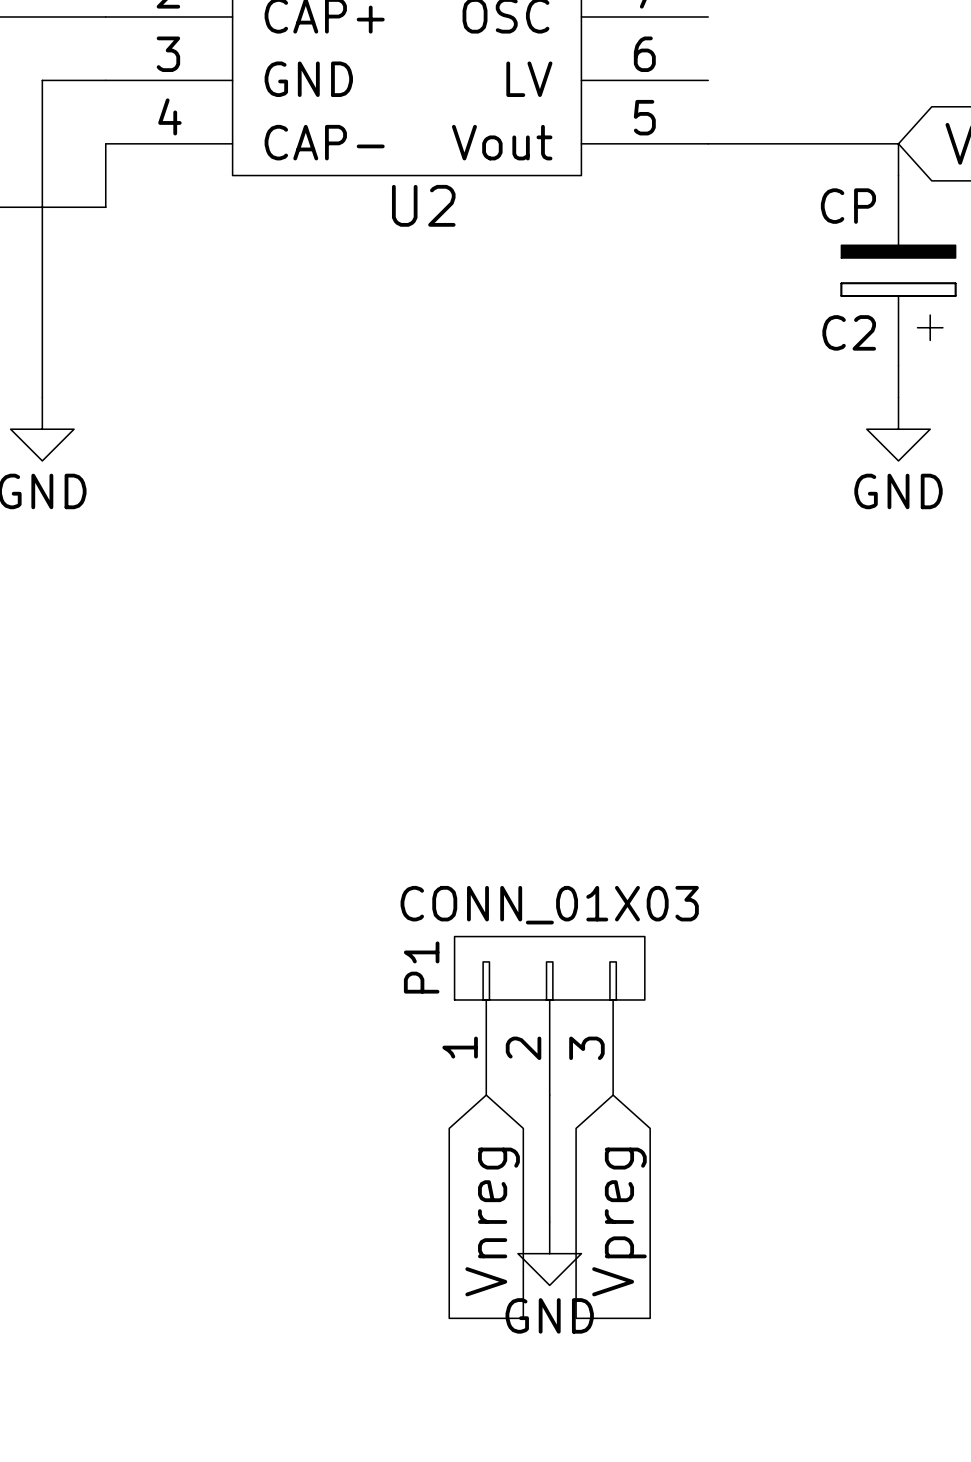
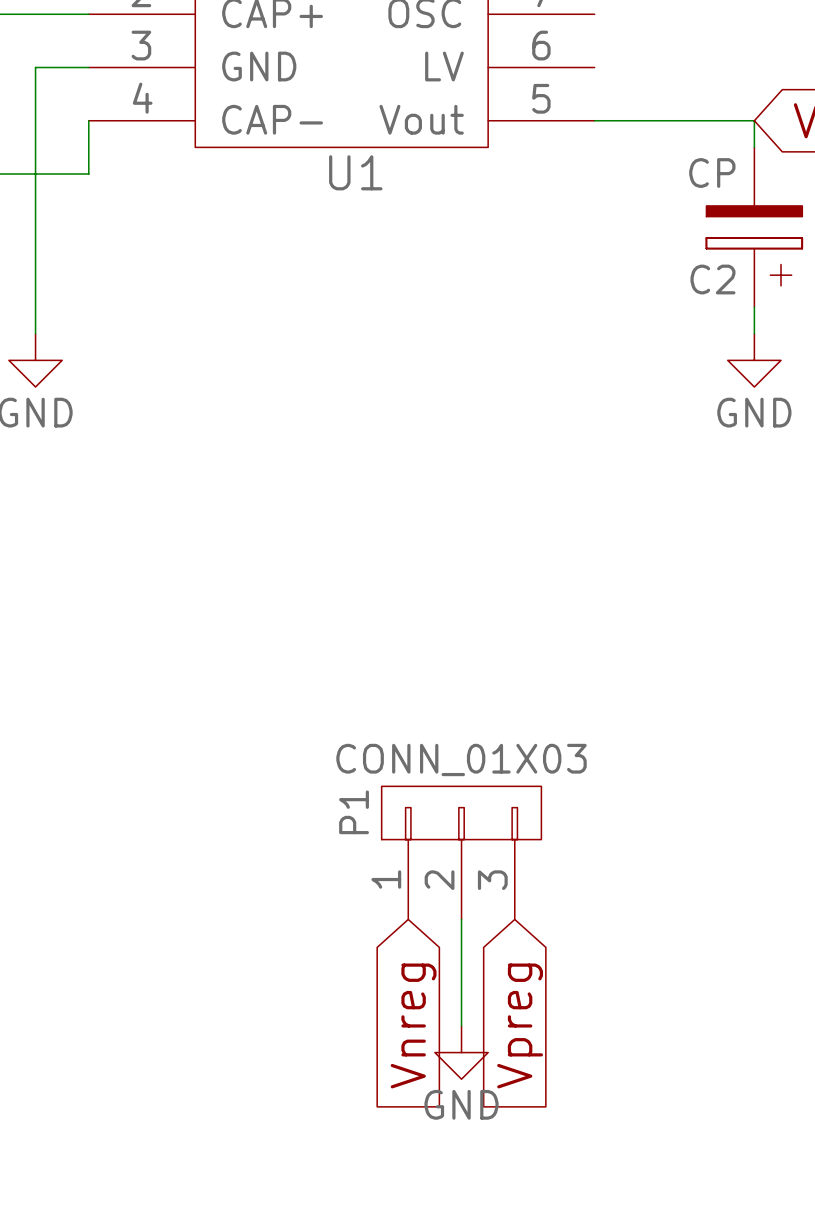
U2 name: U2 (423, 205) -> U1 (355, 172)

